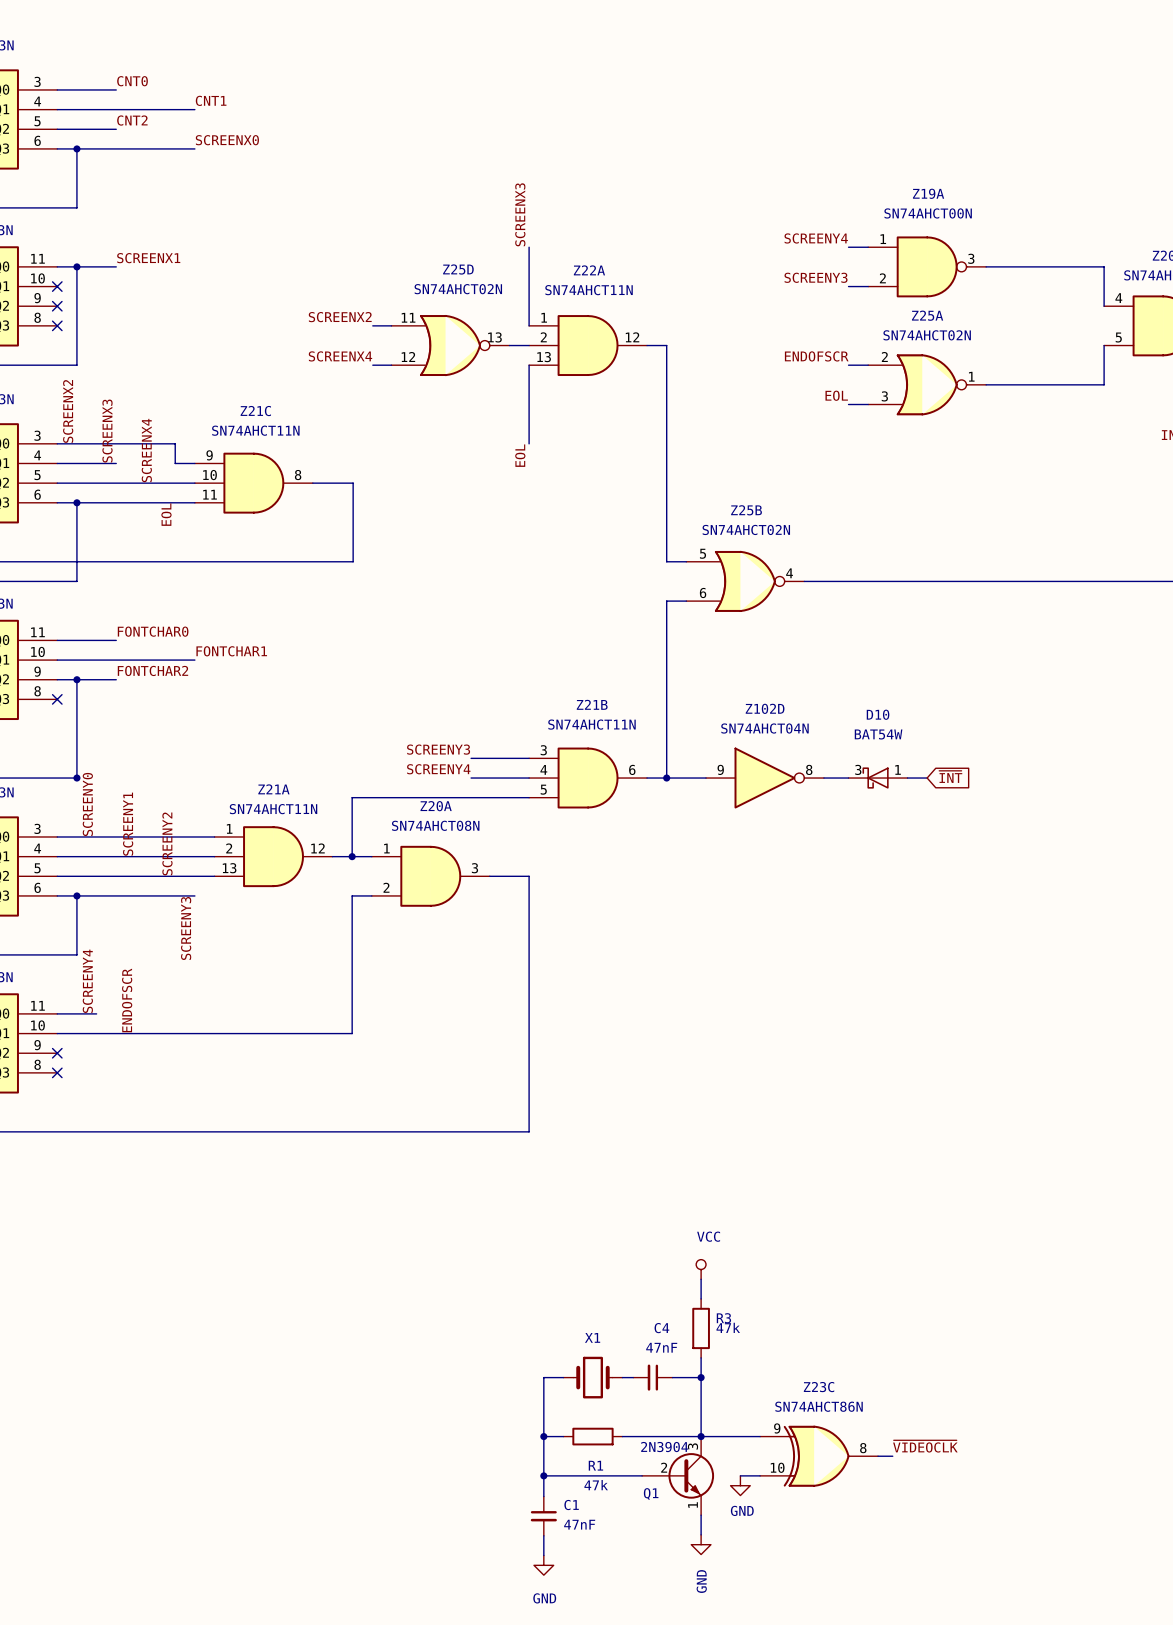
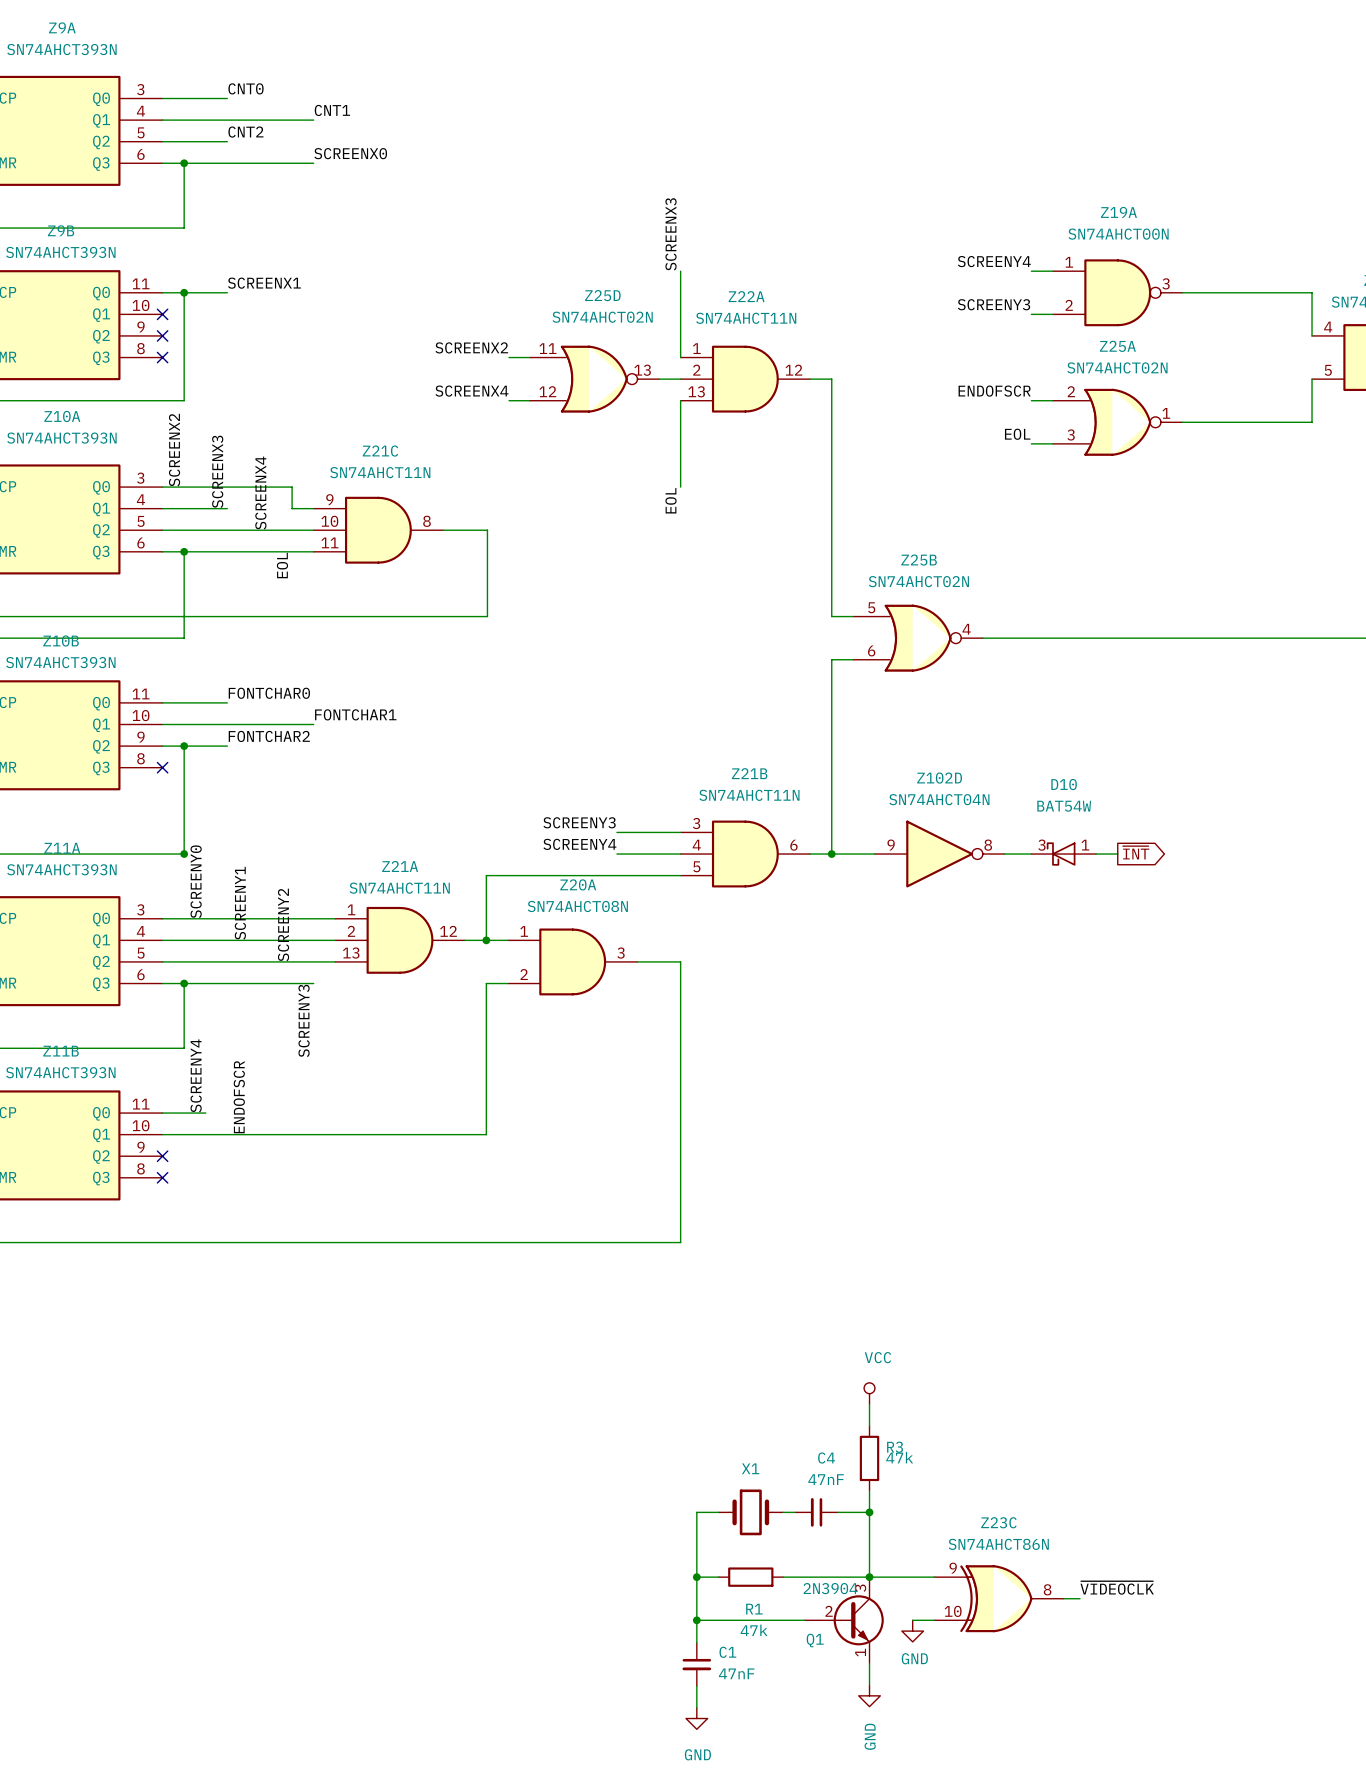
global label shape: input (950, 776) -> output (1136, 852)

